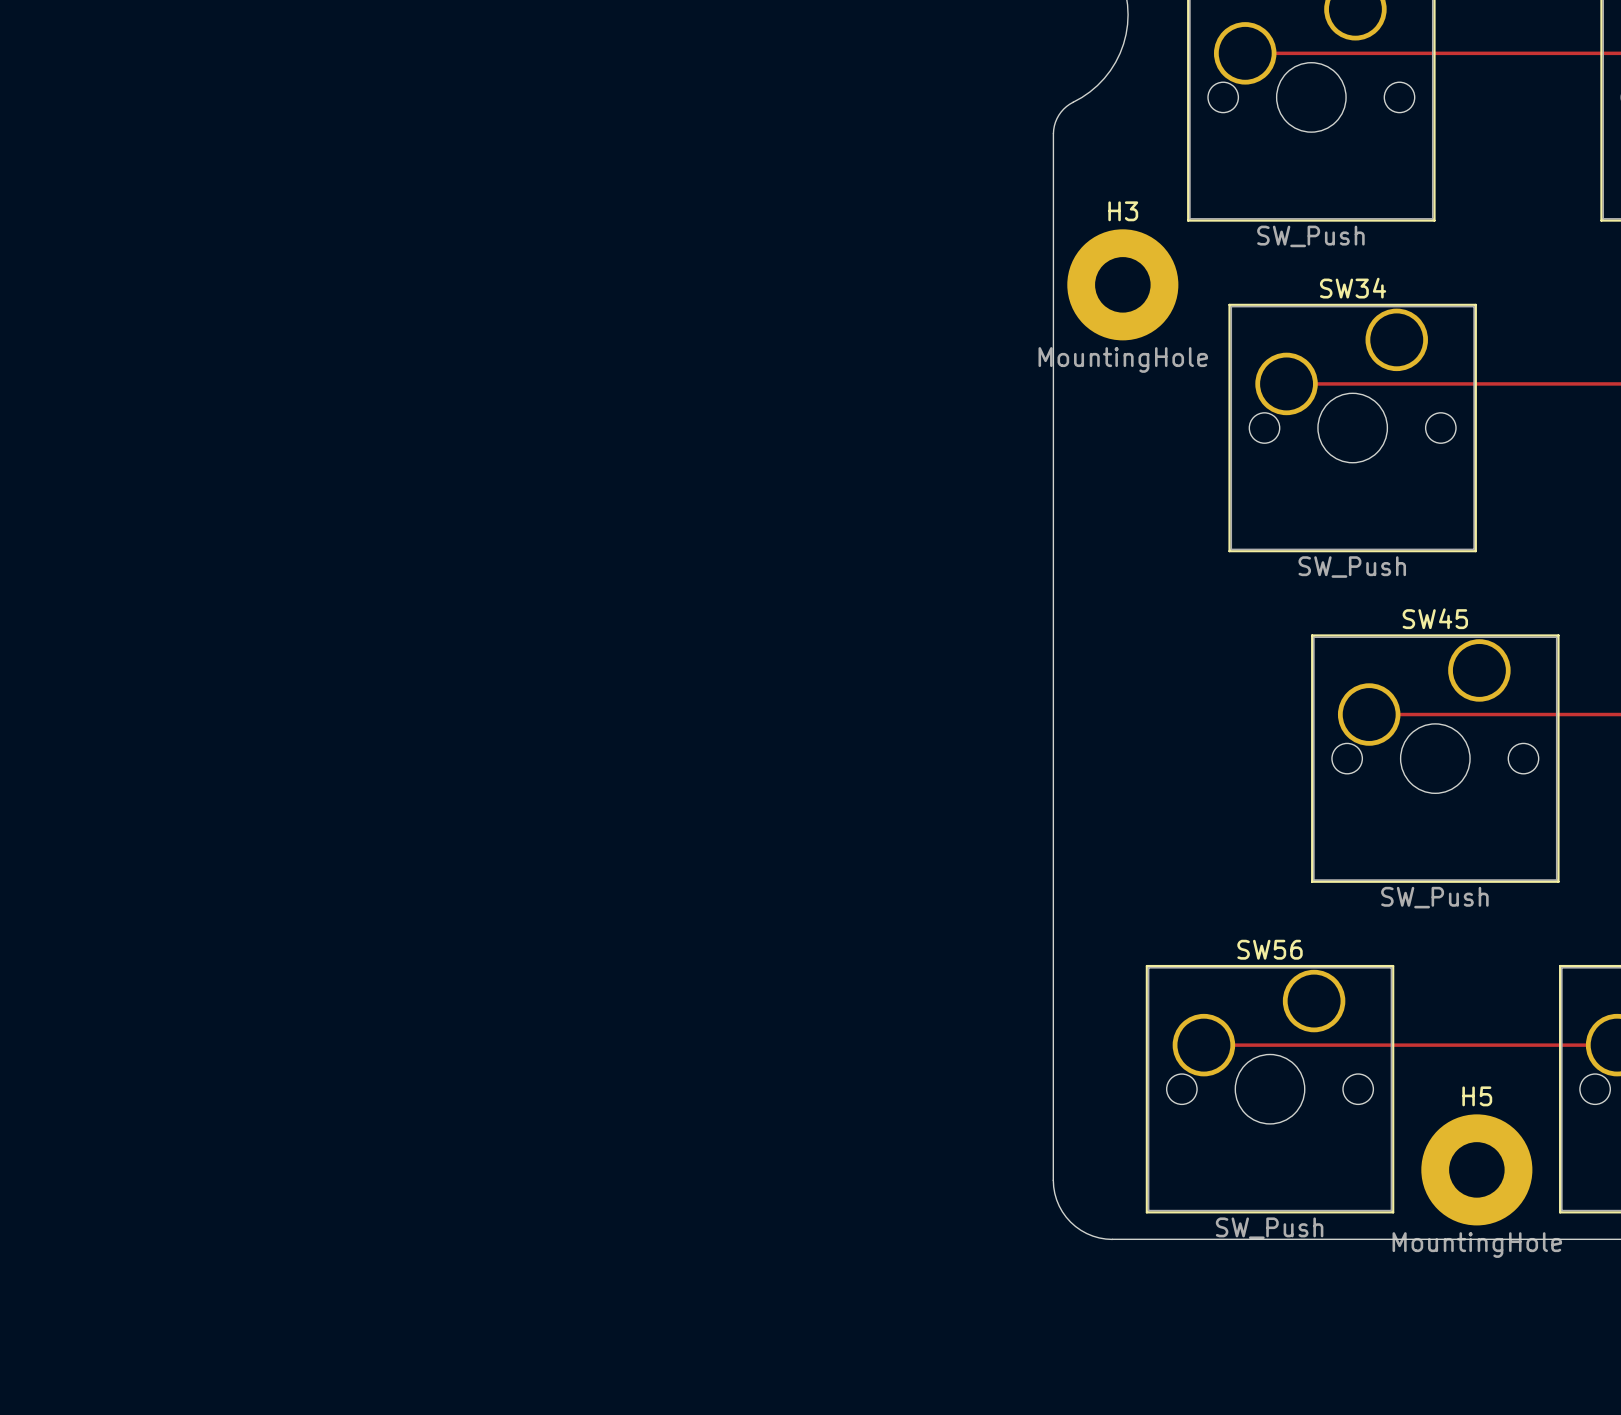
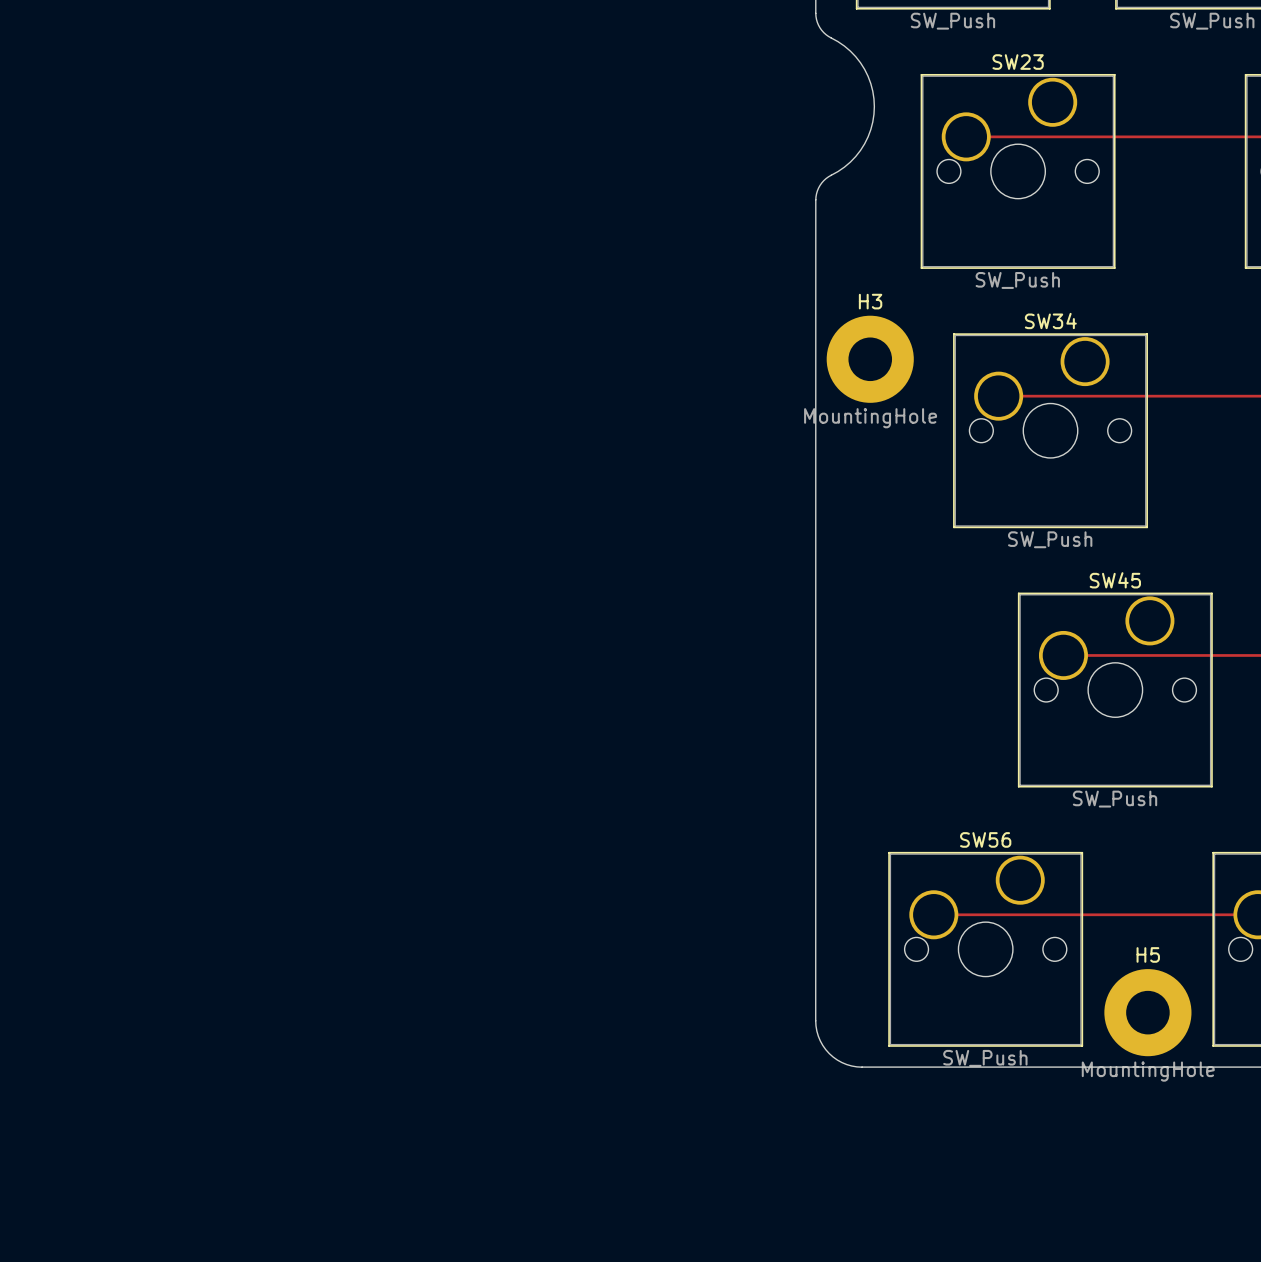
H3 position: (1122, 284) -> (870, 359)

